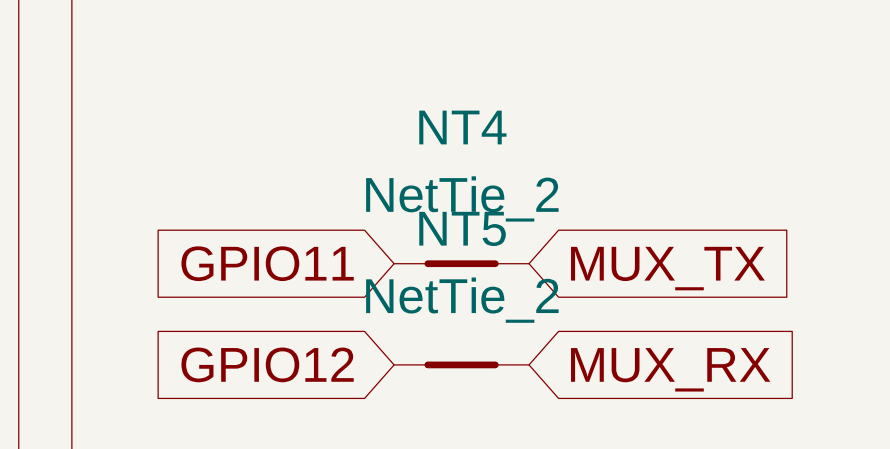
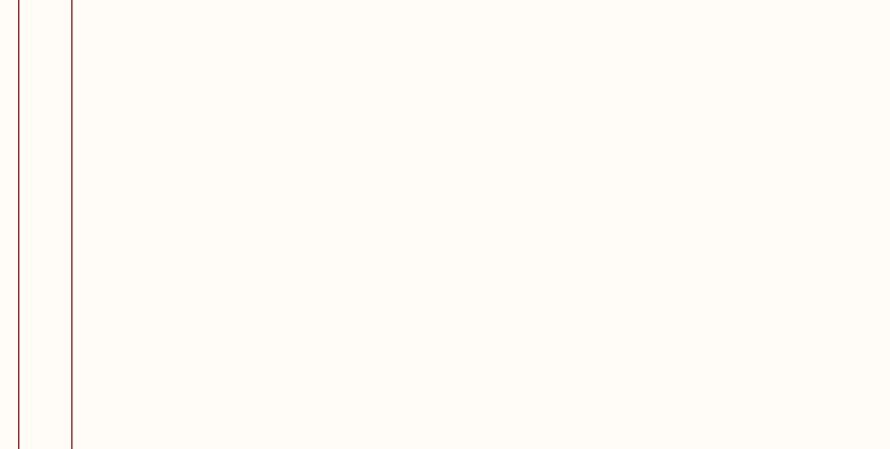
global label: GPIO11 (267, 263) -> none
NT4: NetTie_2 (461, 263) -> none
global label: MUX_TX (667, 268) -> none
global label: GPIO12 (267, 364) -> none
NT5: NetTie_2 (461, 364) -> none
global label: MUX_RX (670, 369) -> none

